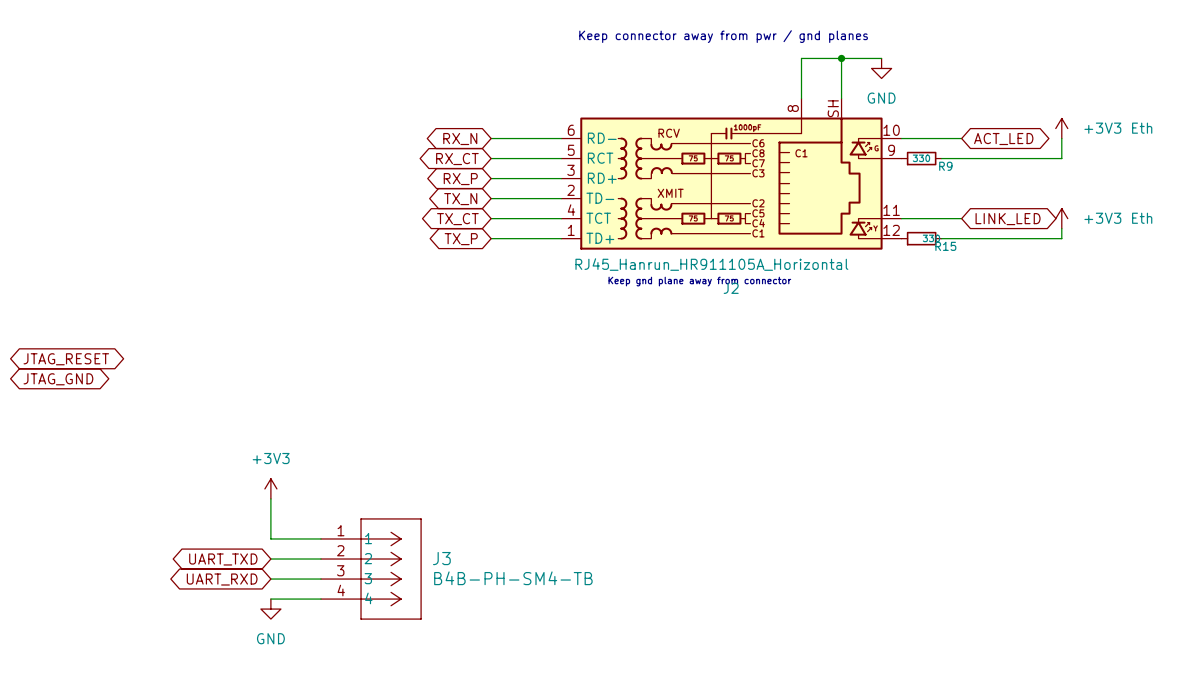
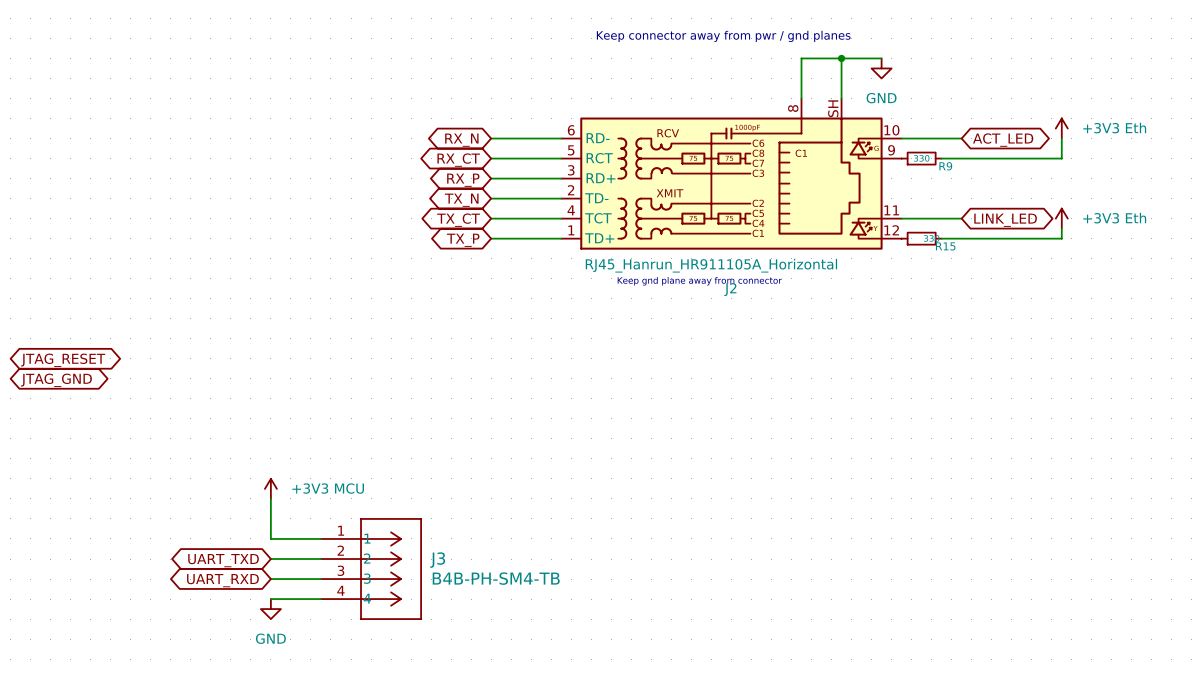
power symbol: +3V3 (270, 488) -> +3V3 MCU (270, 488)

